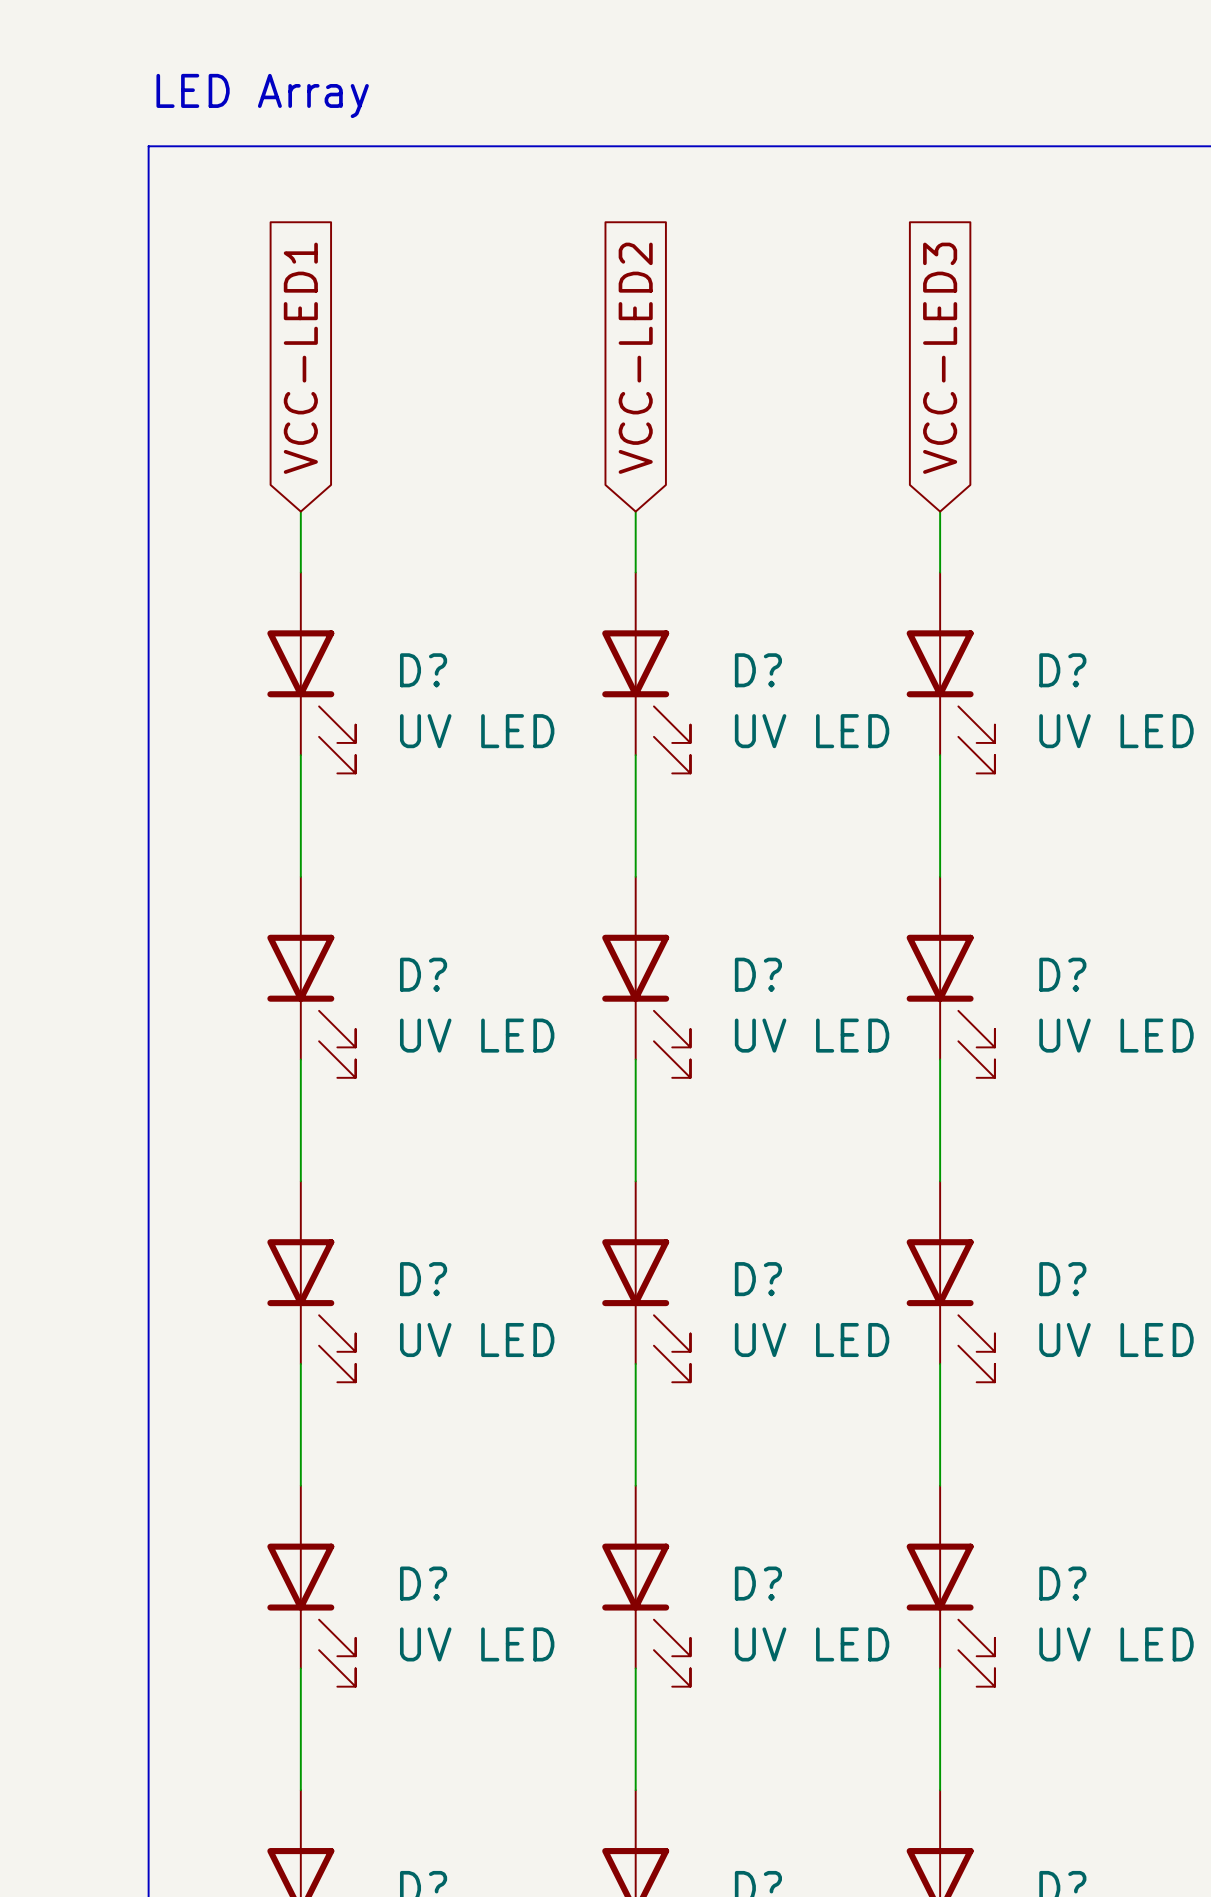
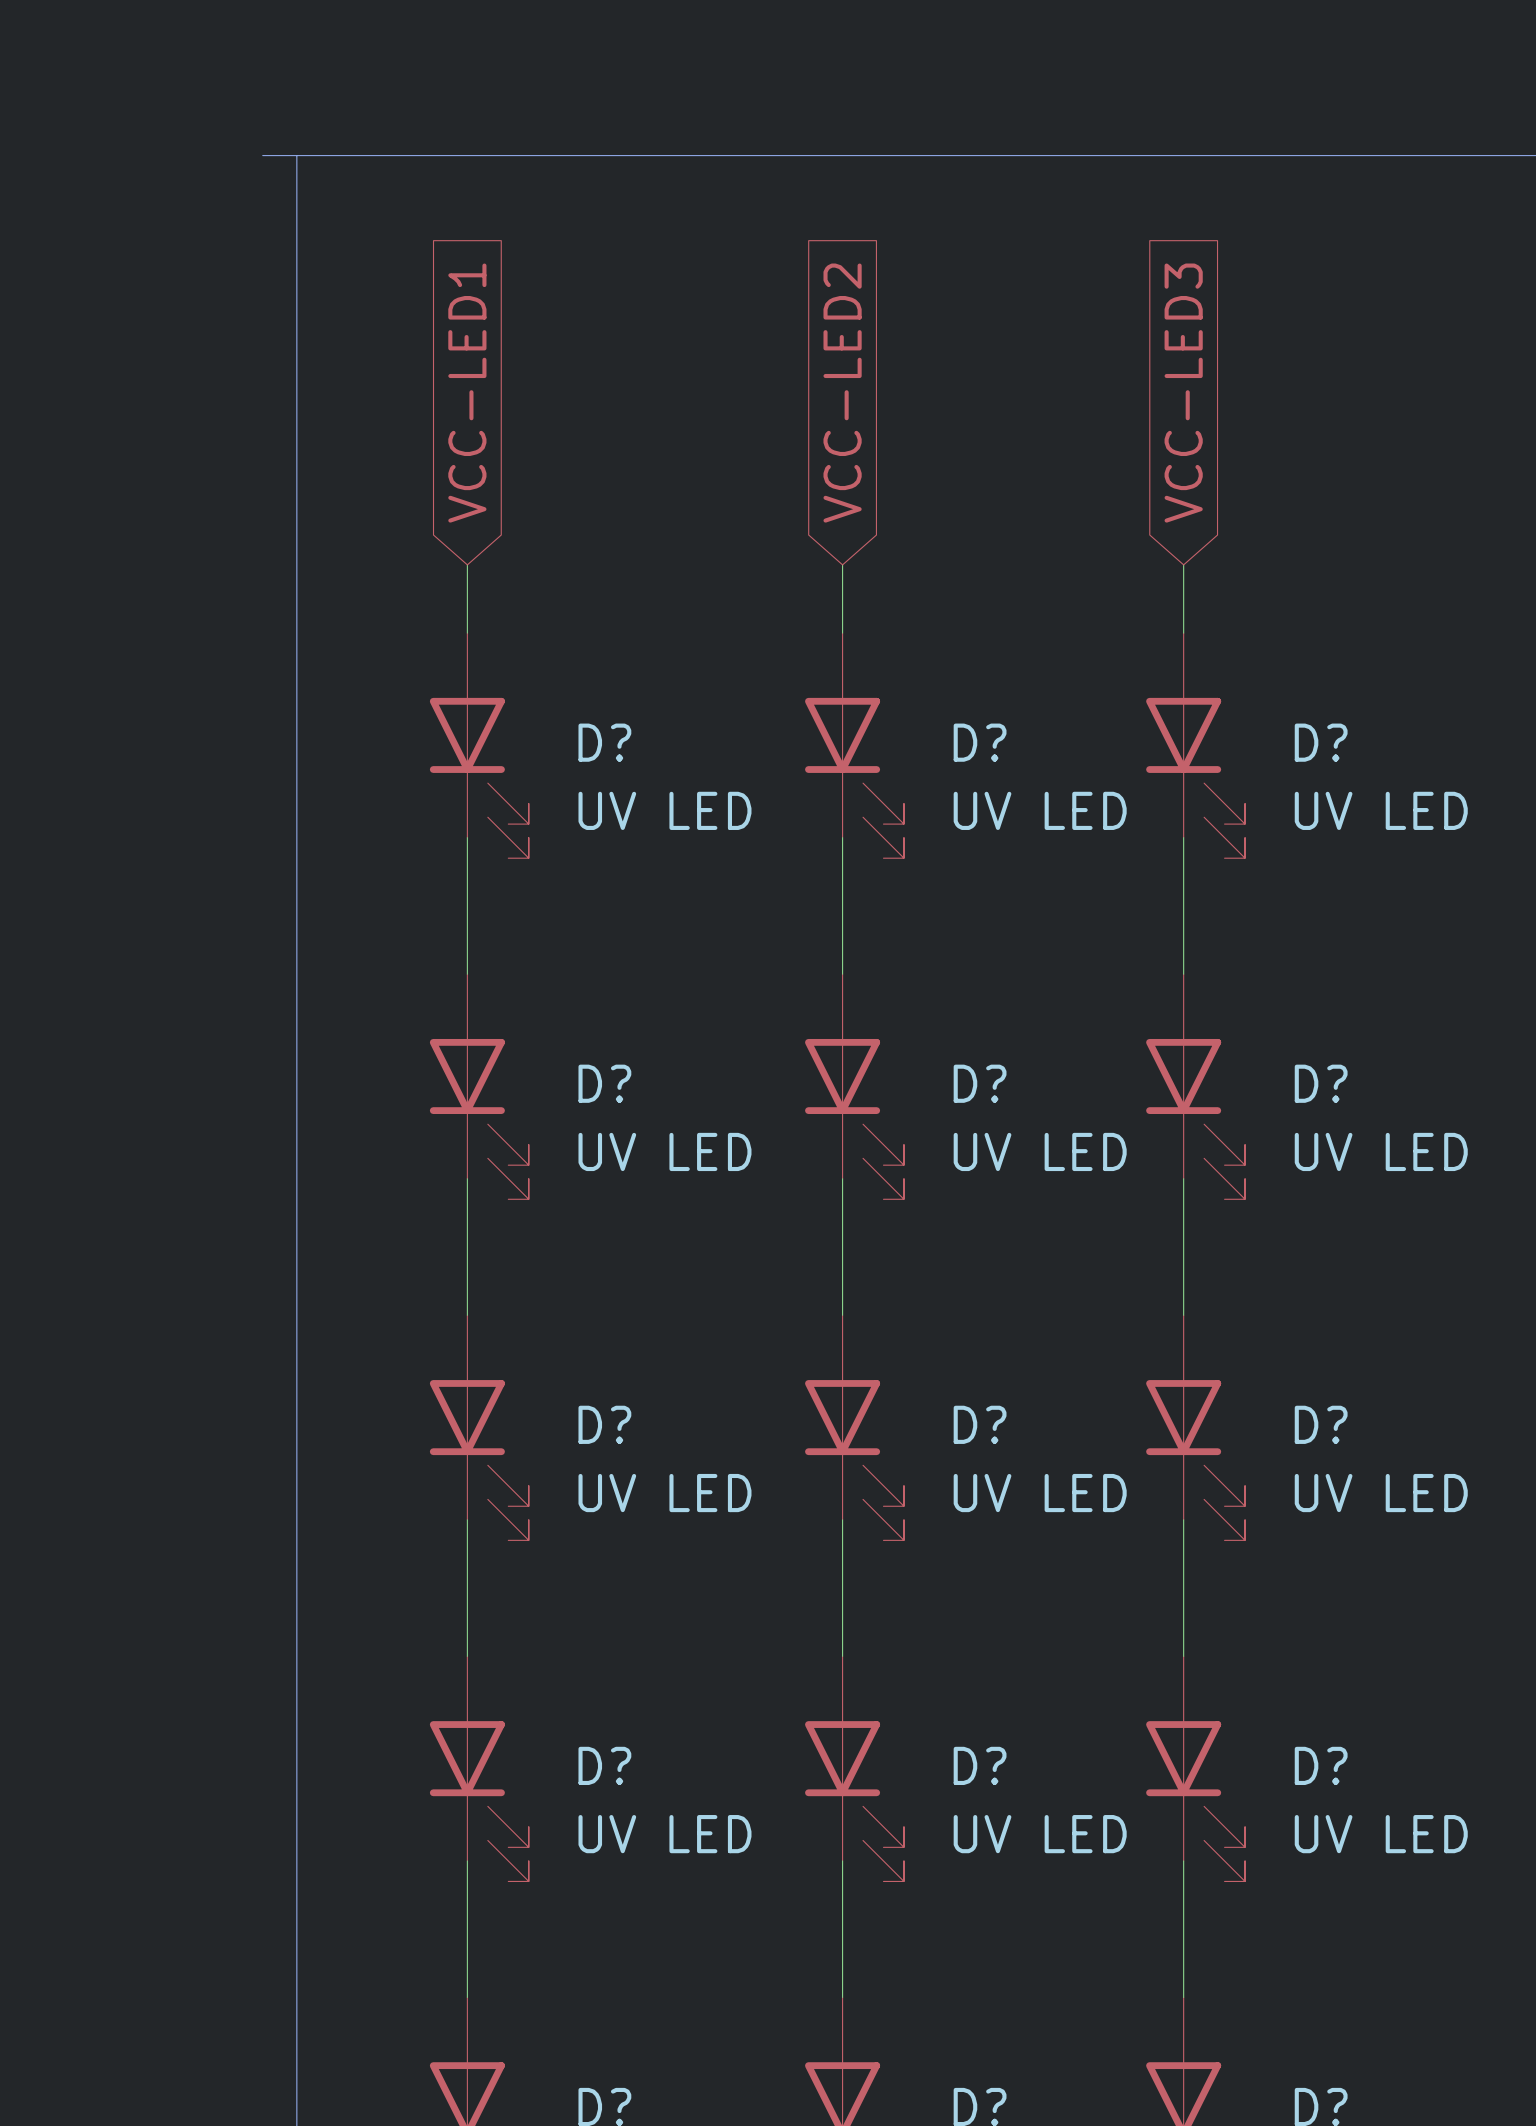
text: LED Array (262, 95) -> none
line: none -> (262, 155) (296, 155)

